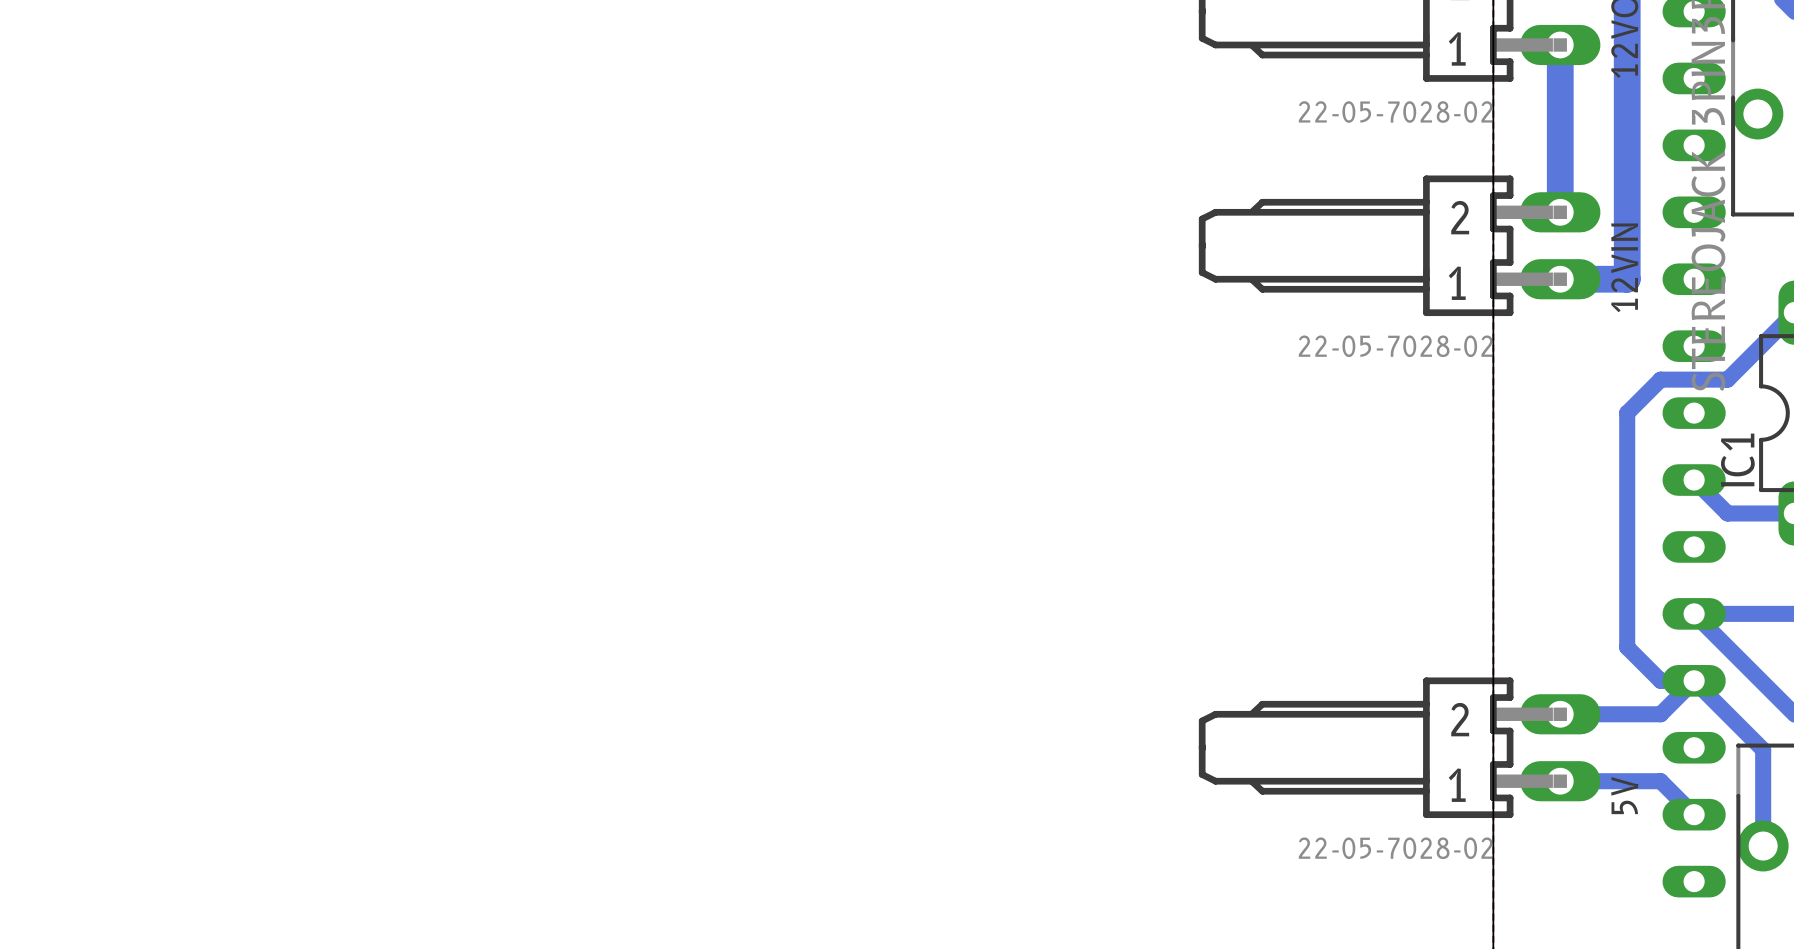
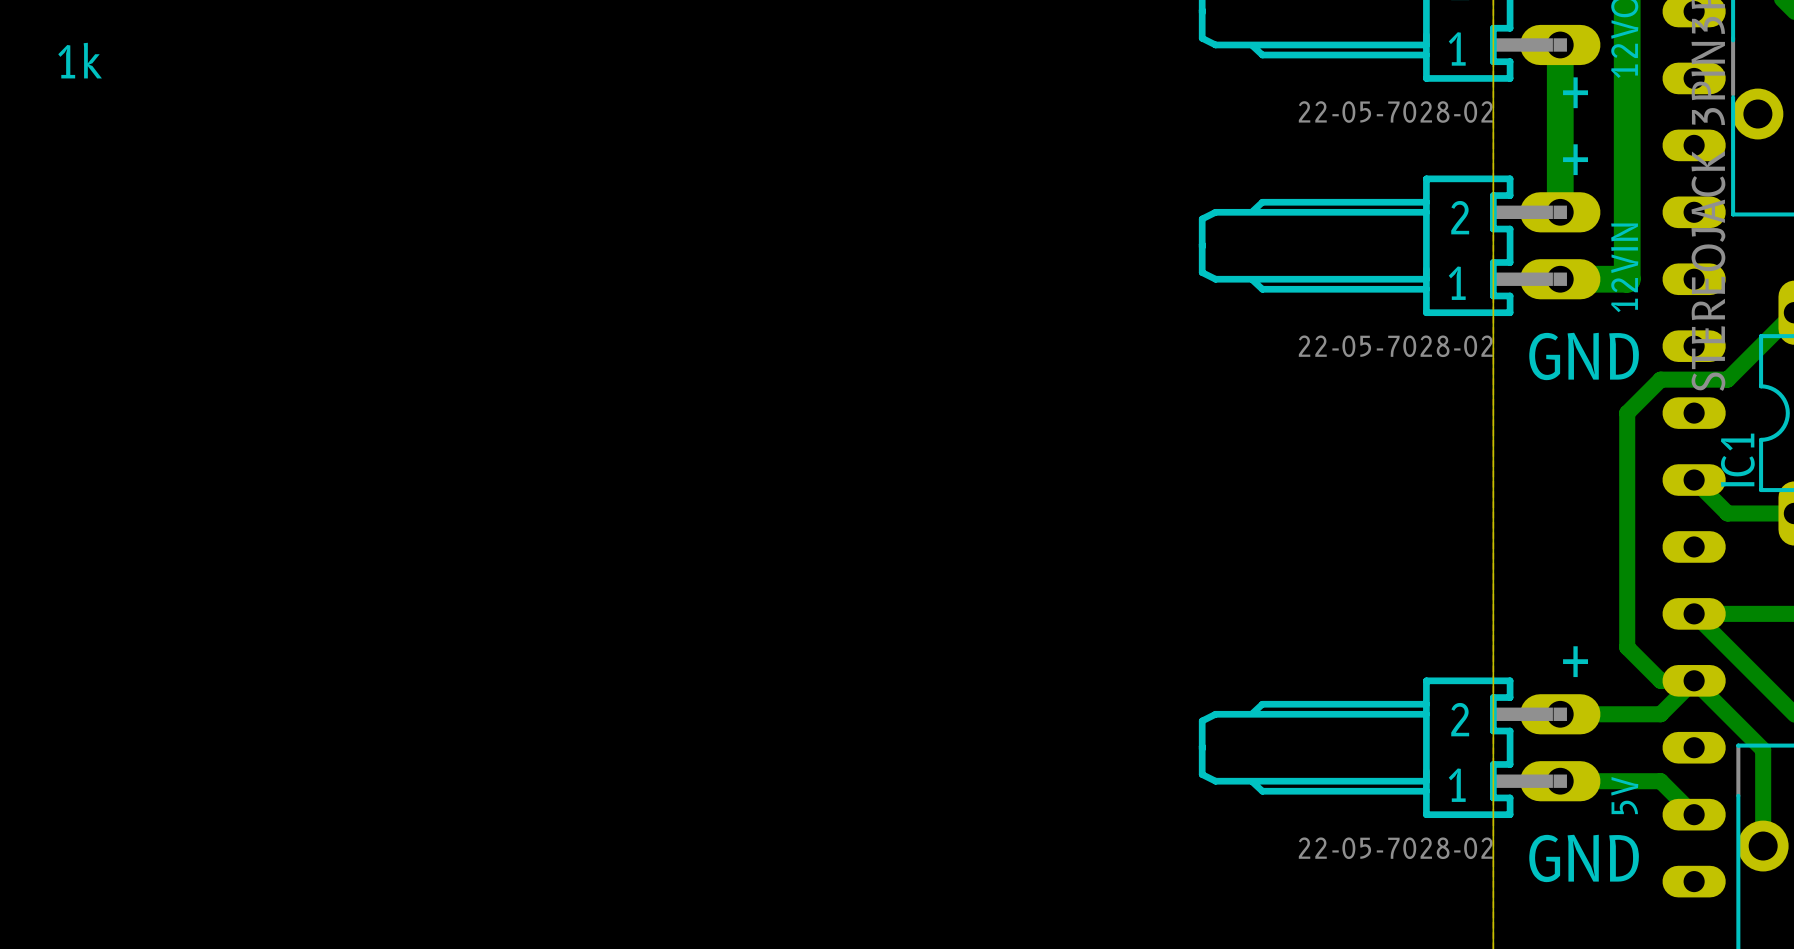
text: none -> 1k (80, 60)
text: none -> + (1575, 92)
text: none -> + (1575, 159)
text: none -> GND (1584, 356)
text: none -> + (1575, 661)
text: none -> GND (1584, 858)

